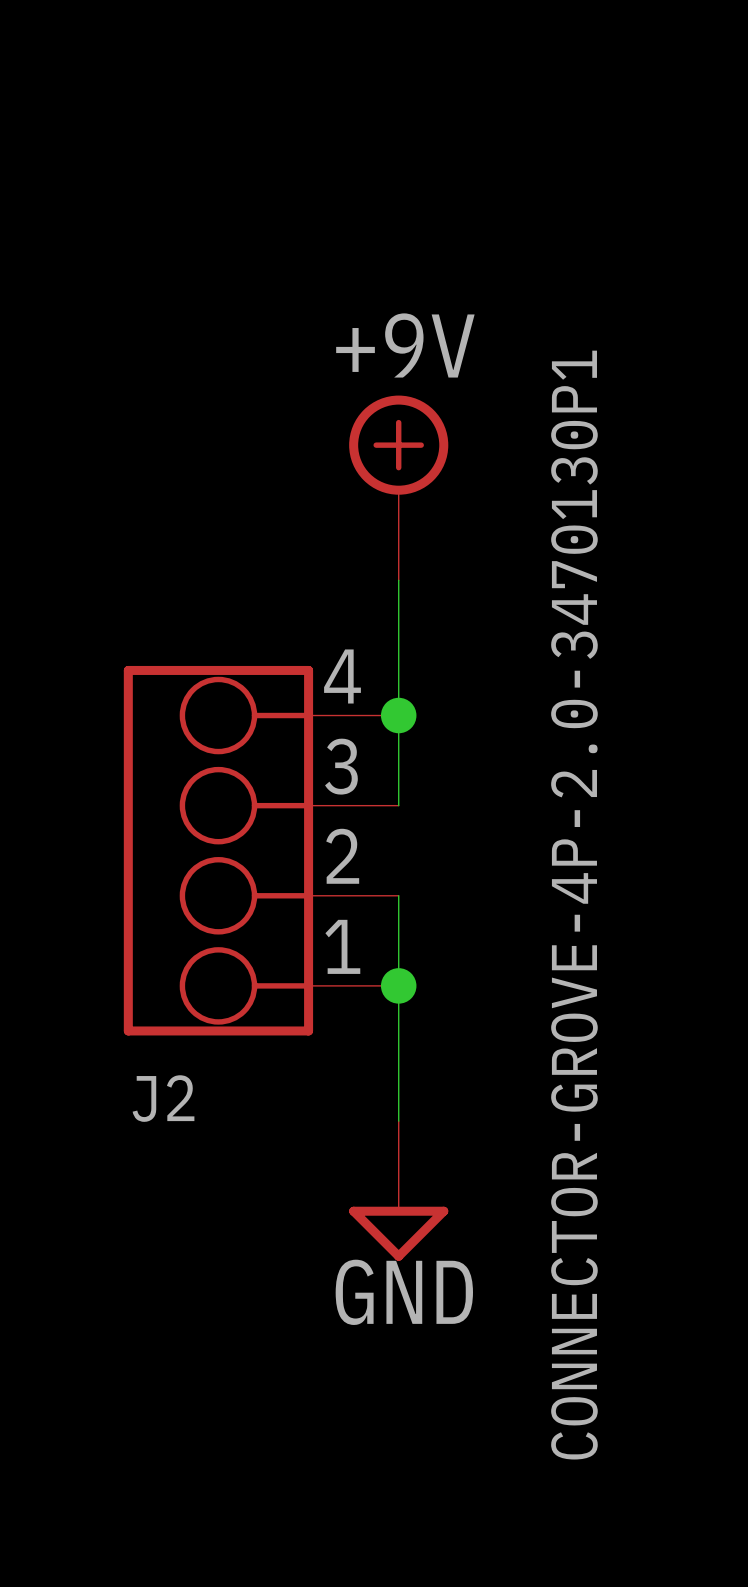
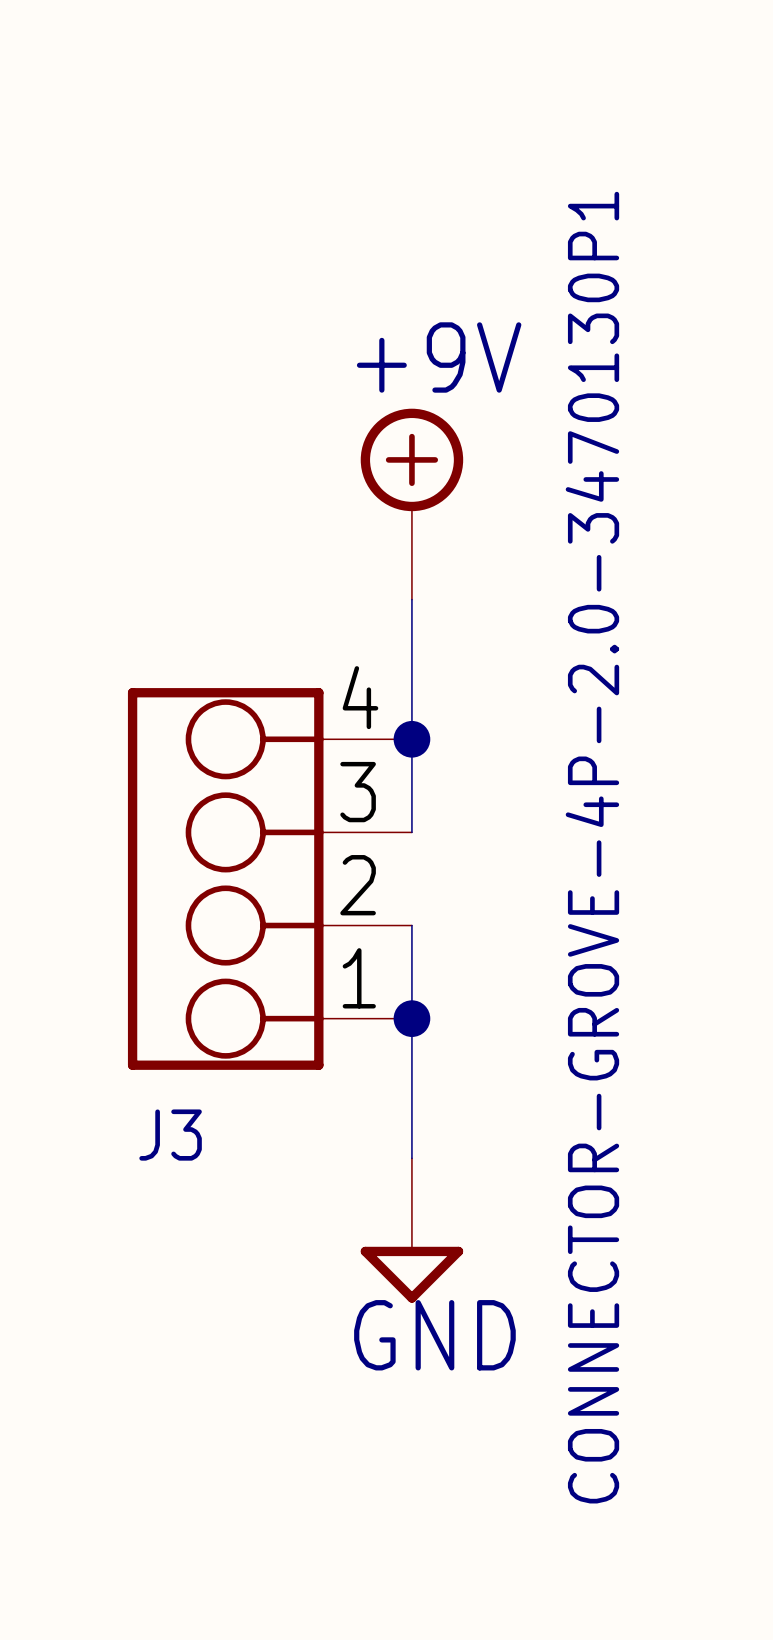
J2 name: J2 (163, 1098) -> J3 (170, 1135)

